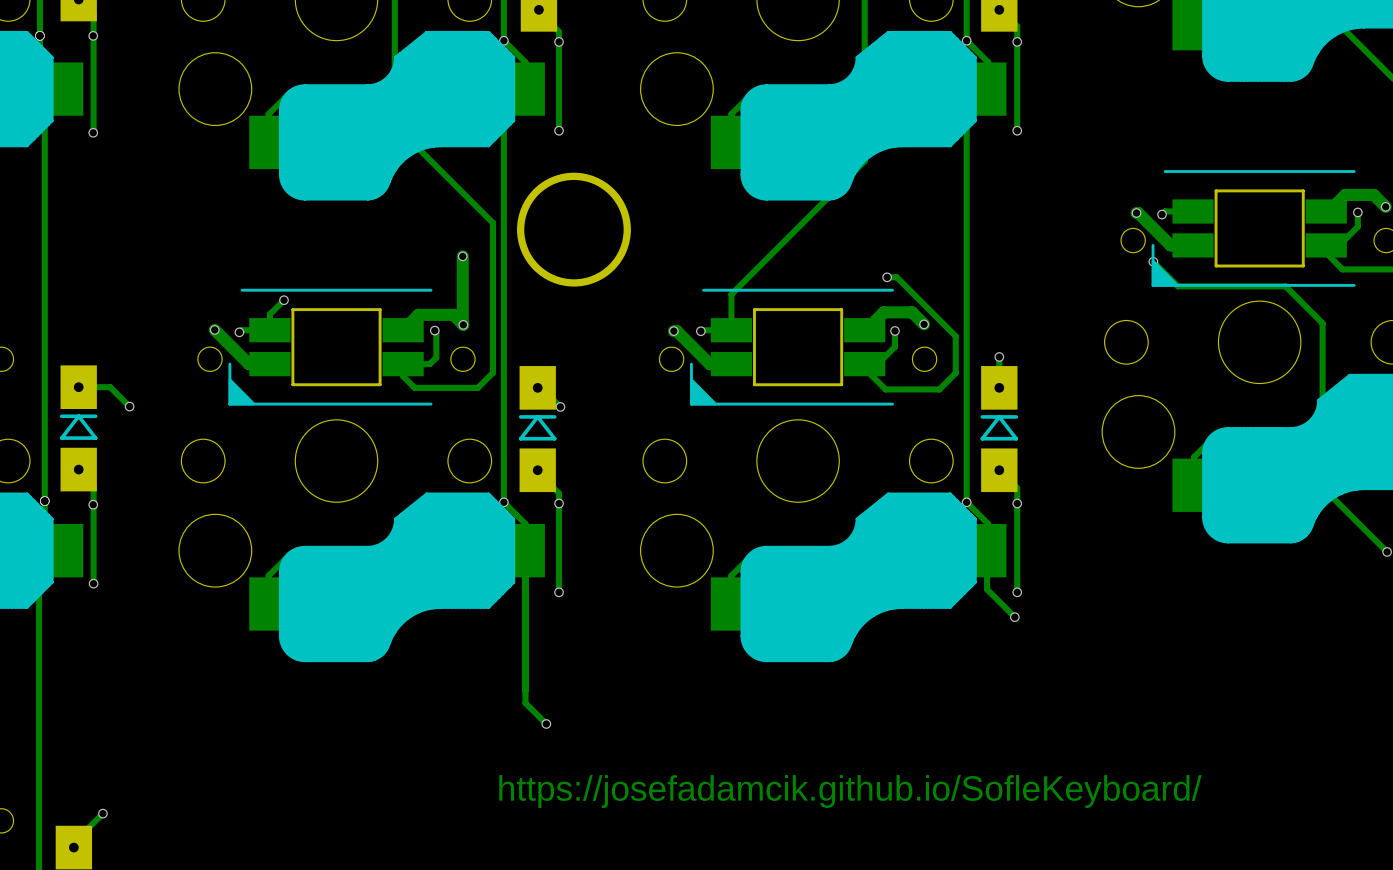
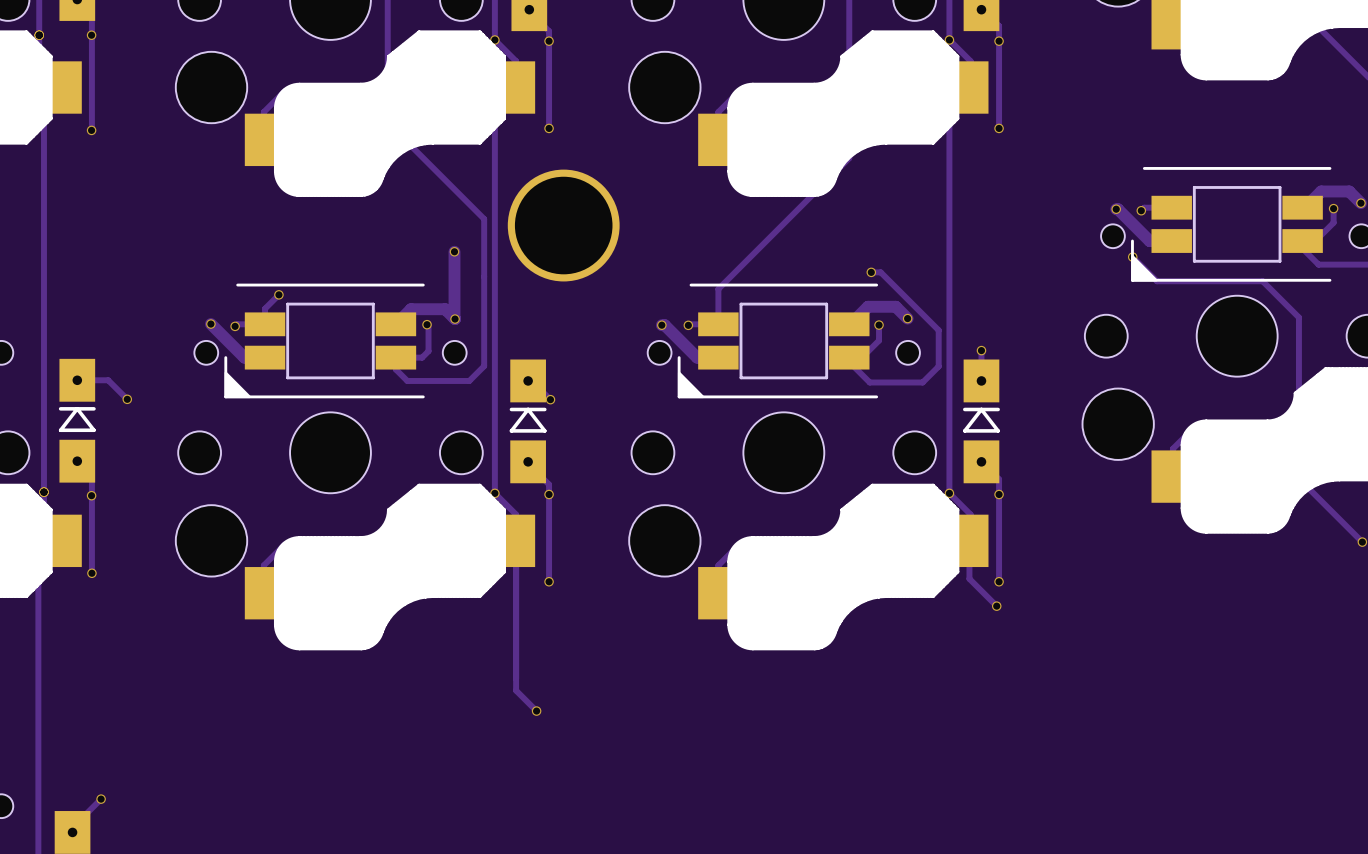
text: https://josefadamcik.github.io/SofleKeyboard/ (850, 791) -> none

